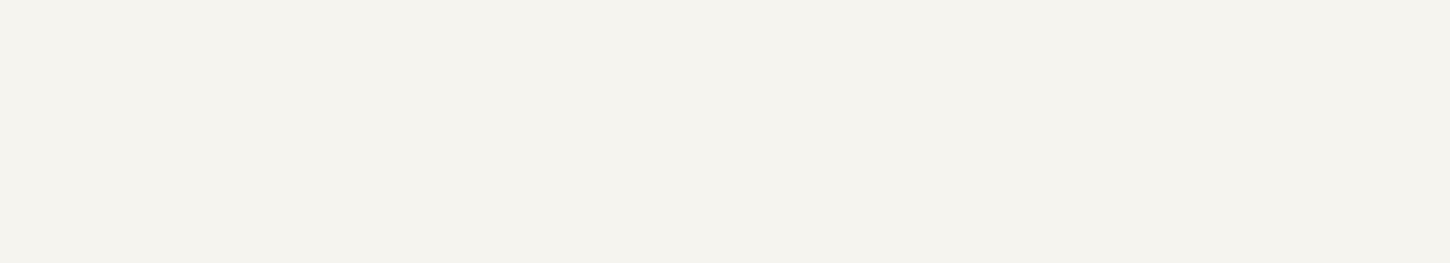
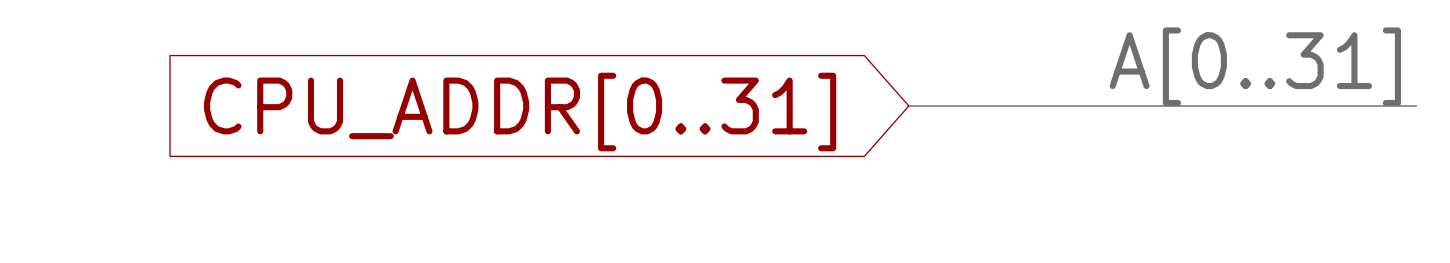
label: none -> A[0..31] (1255, 66)
bus: none -> (908, 105) (1416, 105)
global label: none -> CPU_ADDR[0..31] (520, 112)

